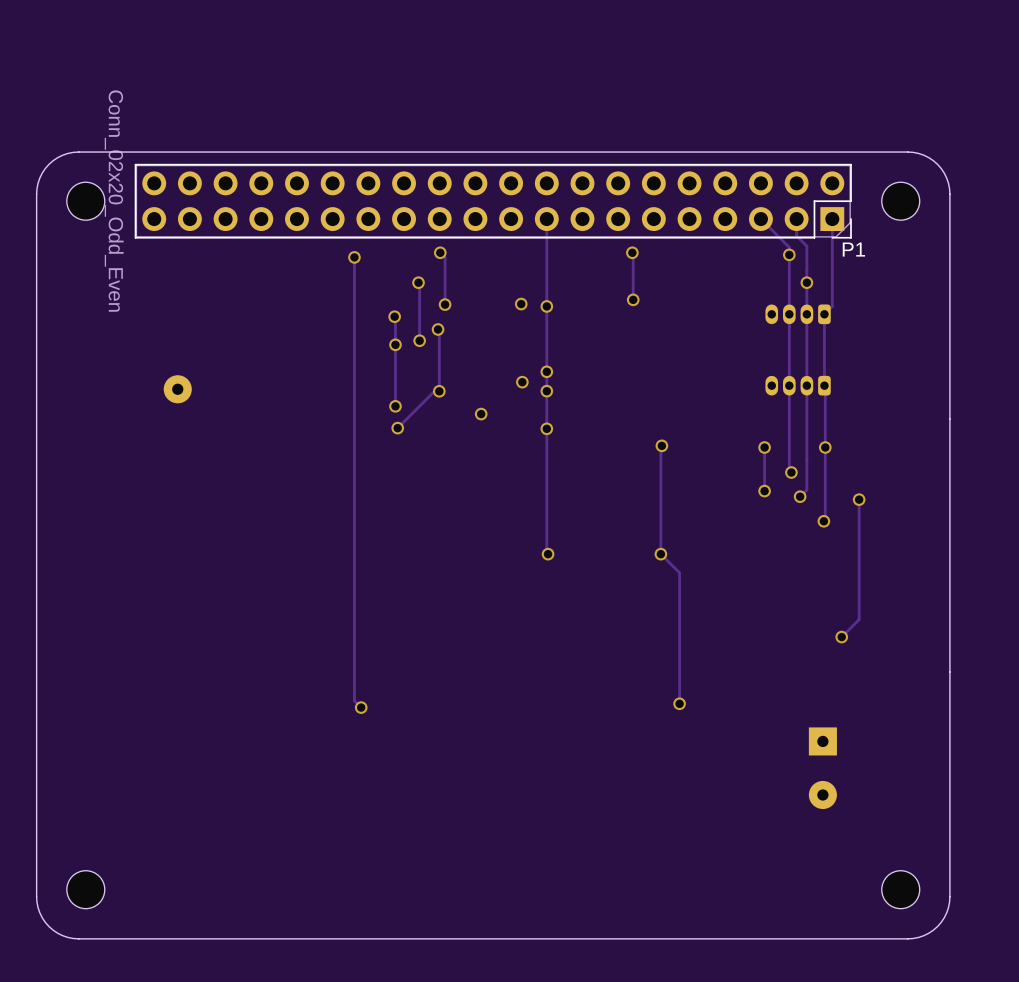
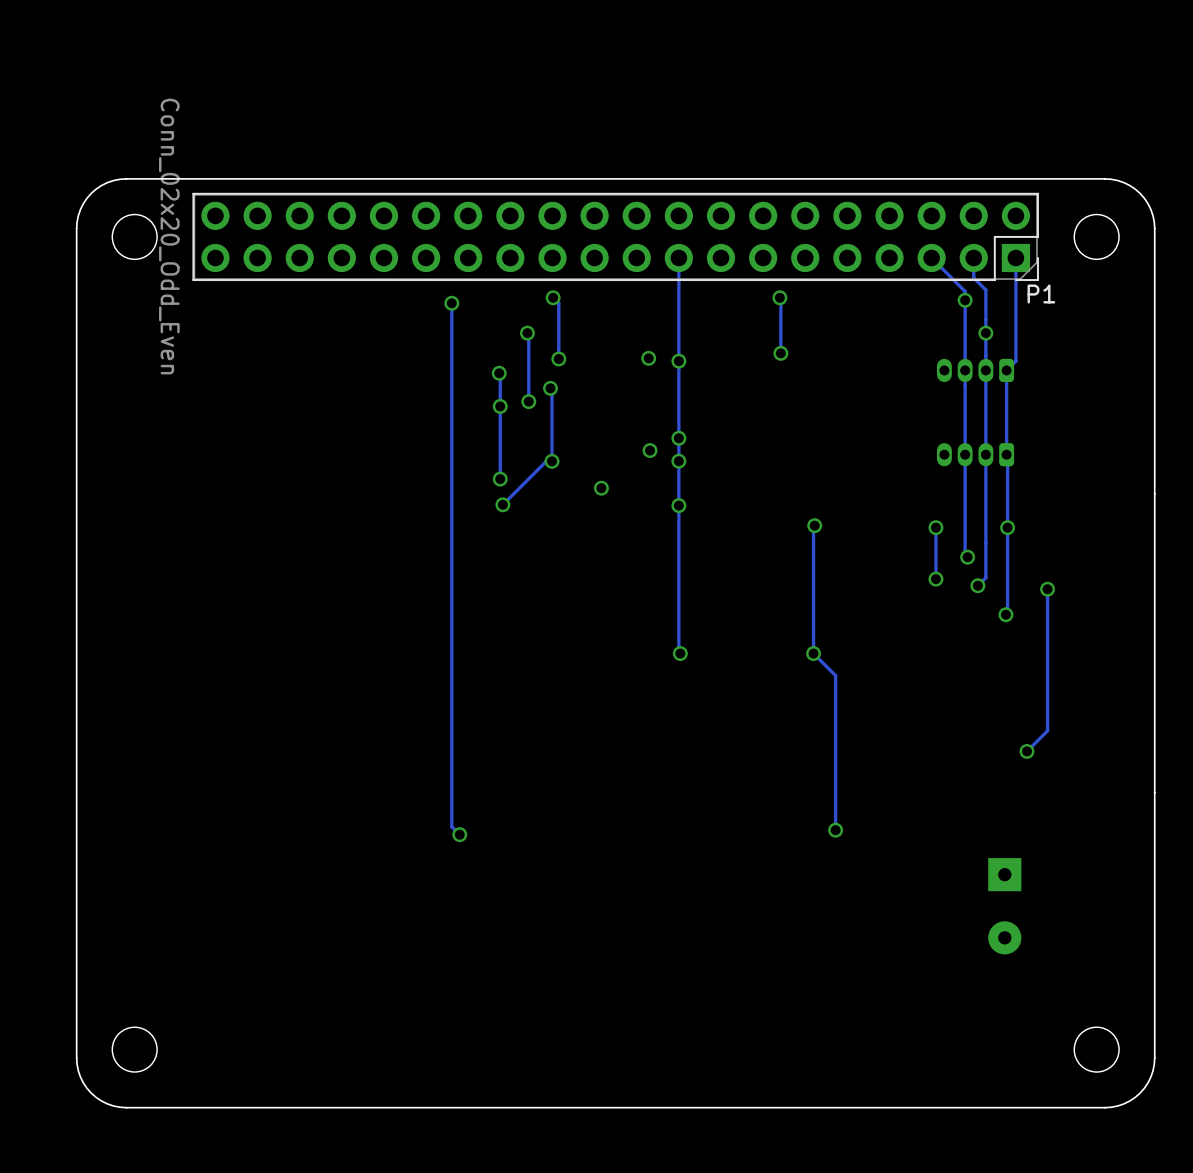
part: (177, 389) -> none

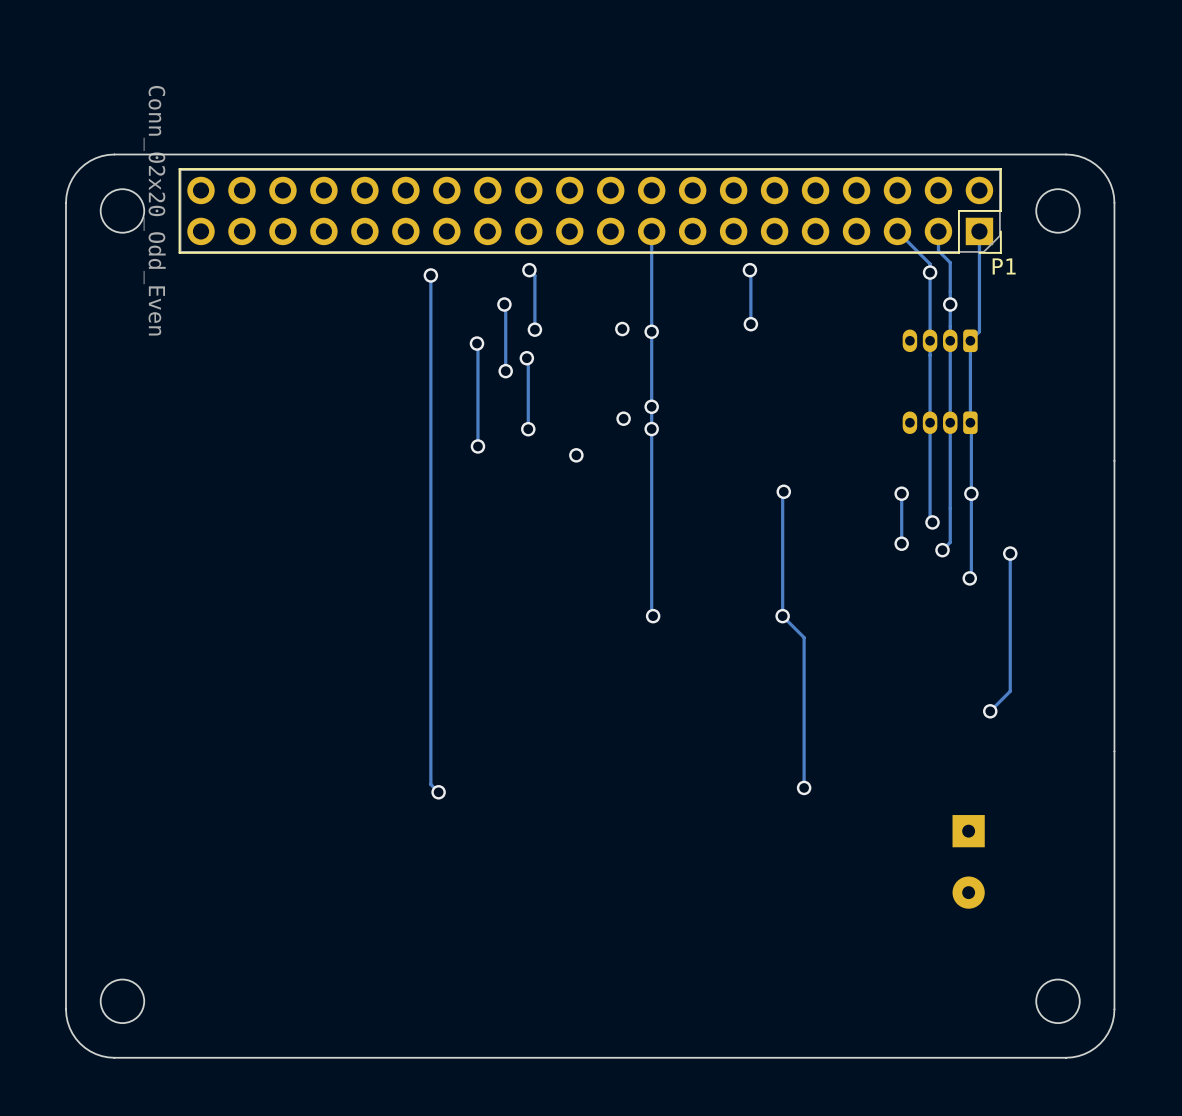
via: (500, 406) -> none
track: (551, 461) (546, 461) (502, 504) -> none
via: (502, 504) -> none
via: (678, 505) -> none

